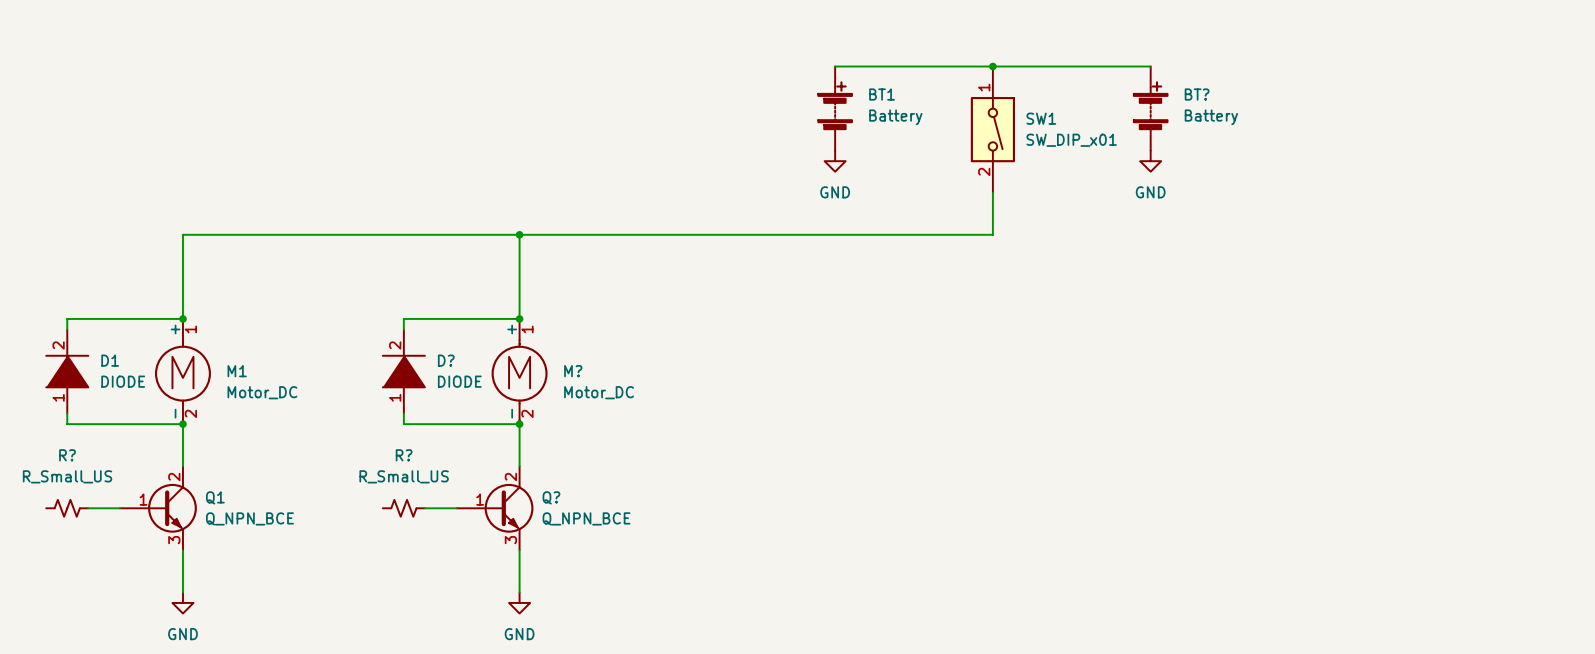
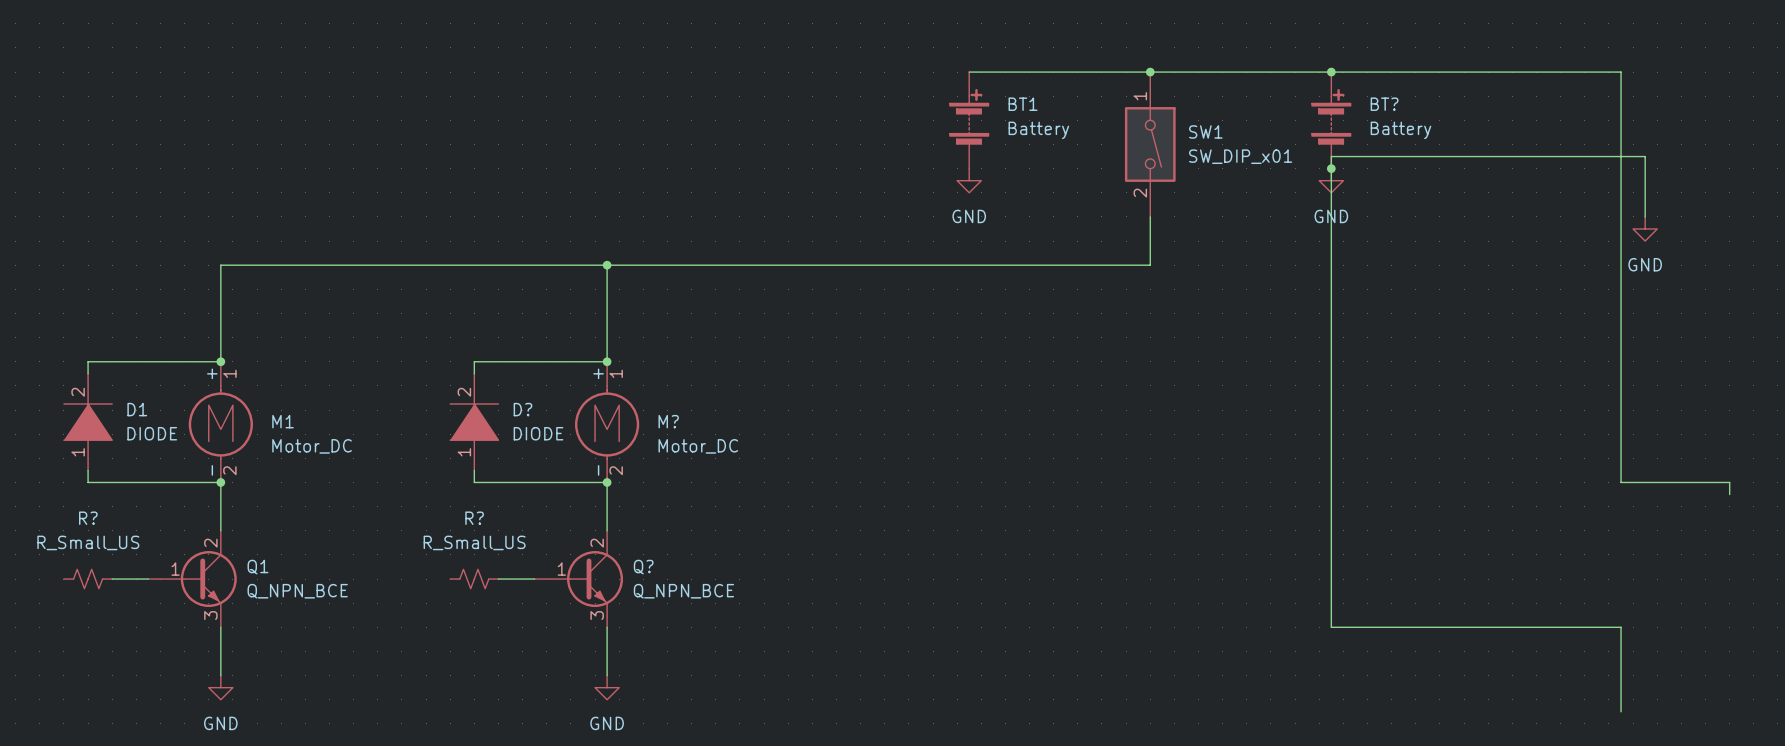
wire: none -> (1331, 72) (1621, 72) (1621, 482) (1729, 482) (1729, 494)
junction: none -> (1331, 72)
junction: none -> (1331, 168)
wire: none -> (1645, 216) (1645, 156) (1331, 156) (1331, 627) (1621, 627) (1621, 711)
power symbol: none -> GND (1645, 228)

